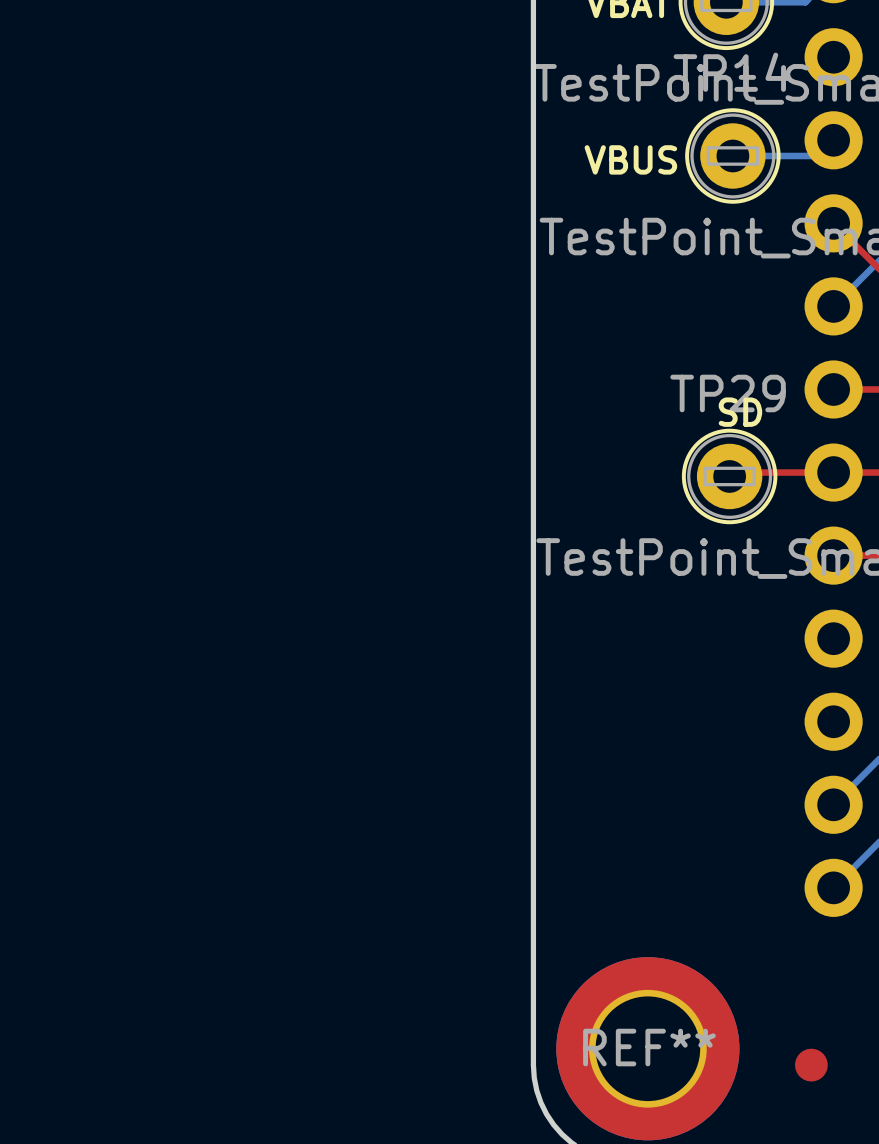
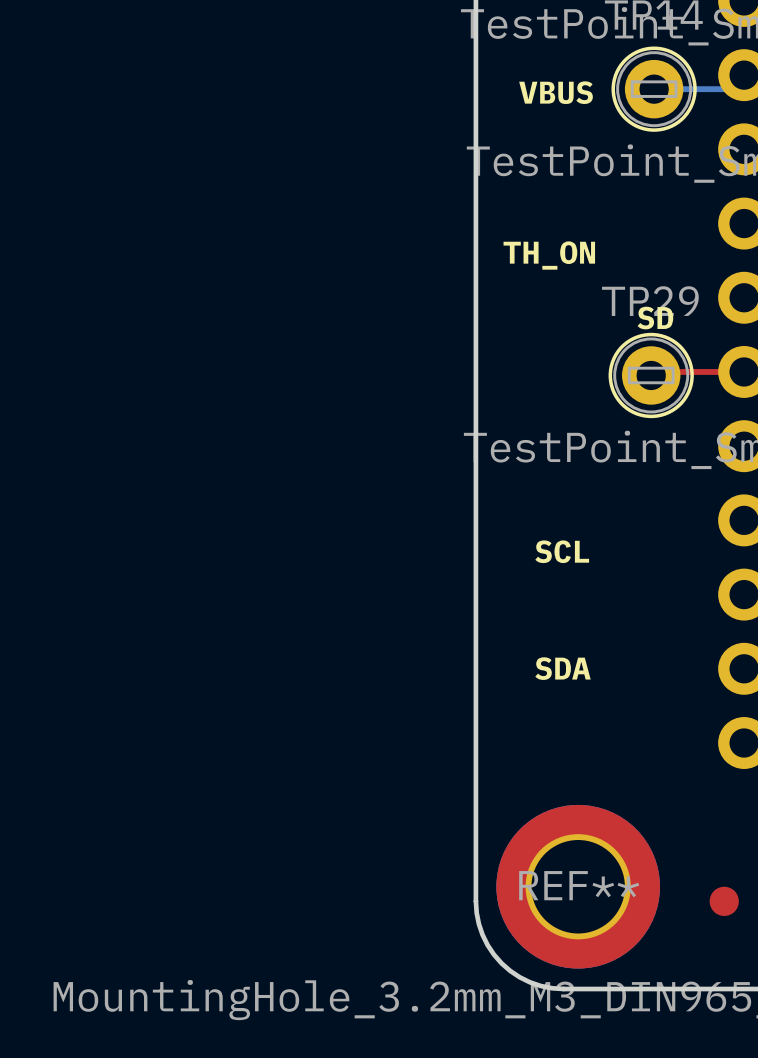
text: none -> TH_ON (549, 255)
text: none -> SCL (562, 551)
text: none -> SDA (563, 668)

